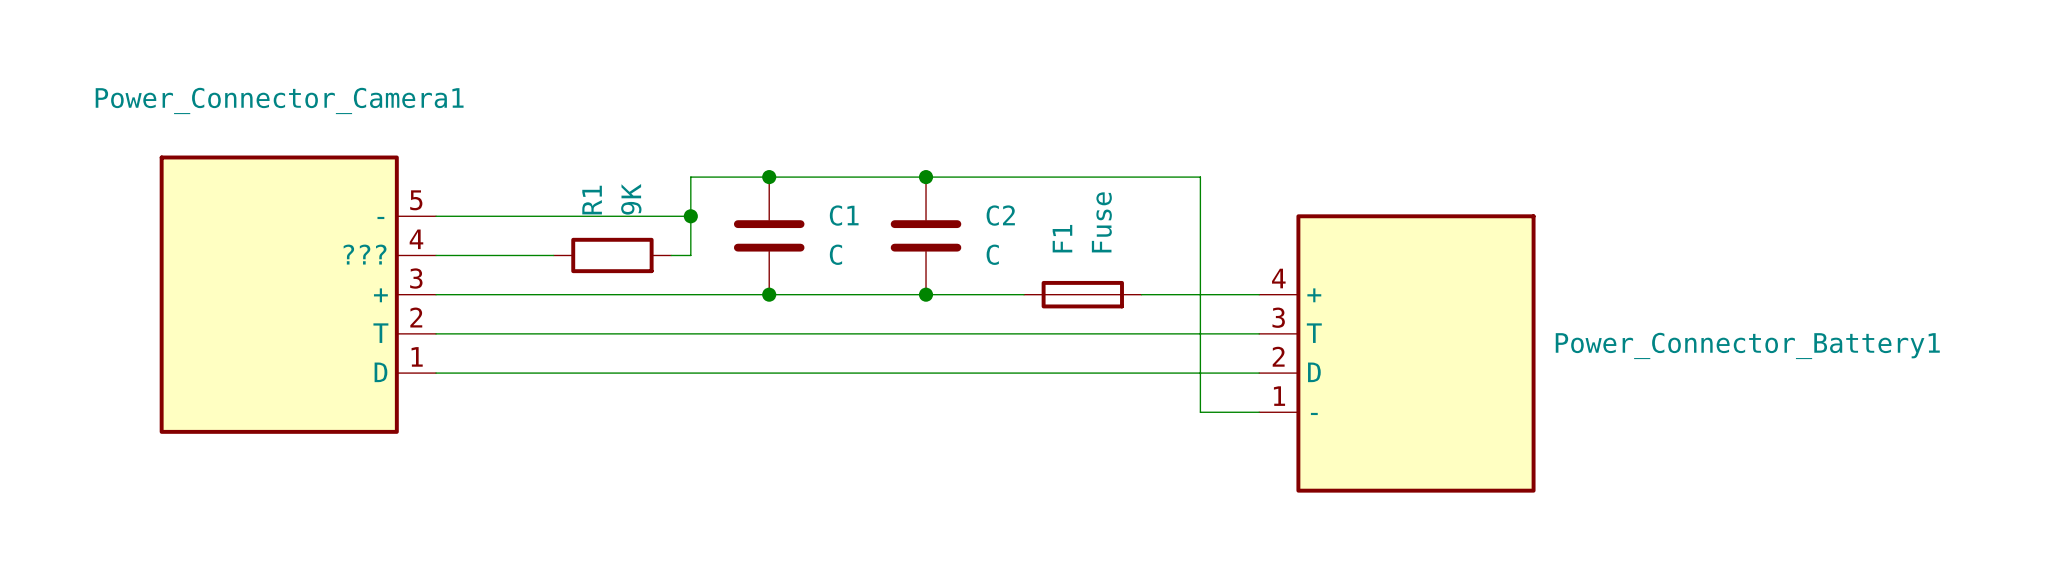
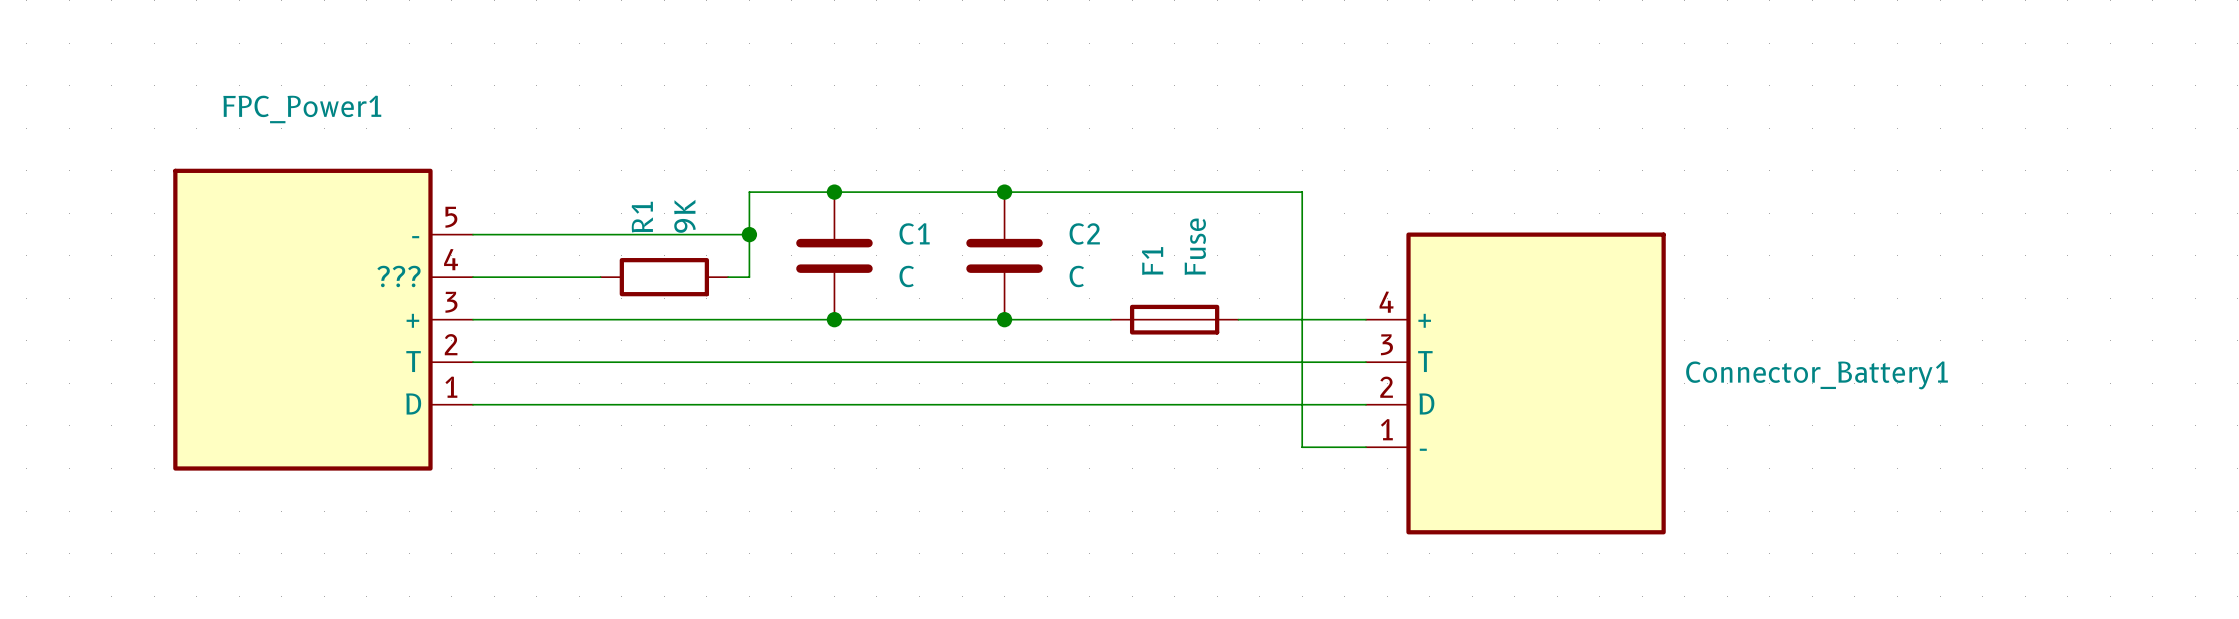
Power_Connector_Camera1 name: Power_Connector_Camera1 (279, 100) -> FPC_Power1 (302, 109)
Power_Connector_Battery1 name: Power_Connector_Battery1 (1747, 345) -> Connector_Battery1 (1817, 375)

